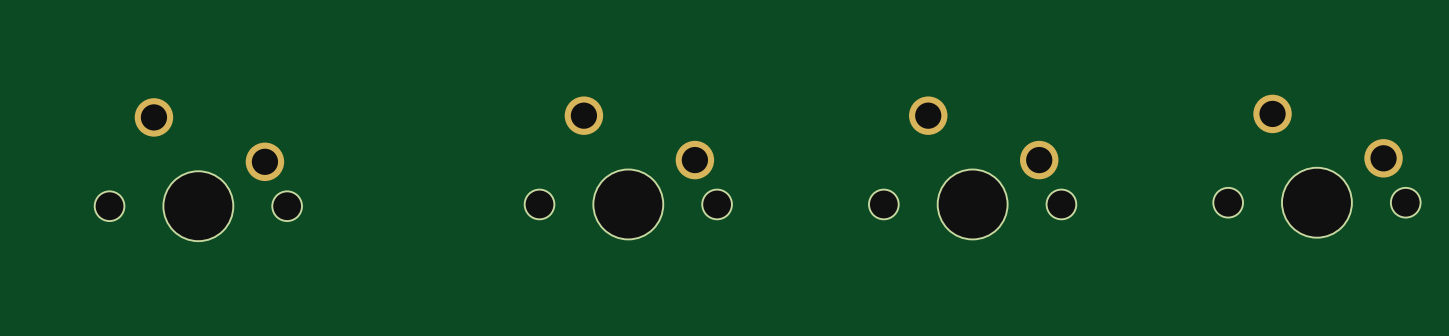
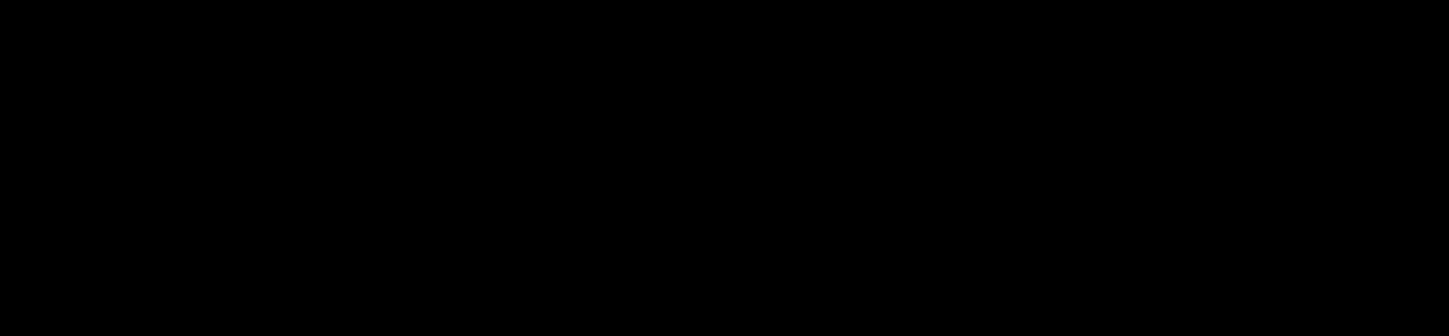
part: (1316, 166) -> none
part: (628, 167) -> none
part: (972, 167) -> none
part: (198, 169) -> none

